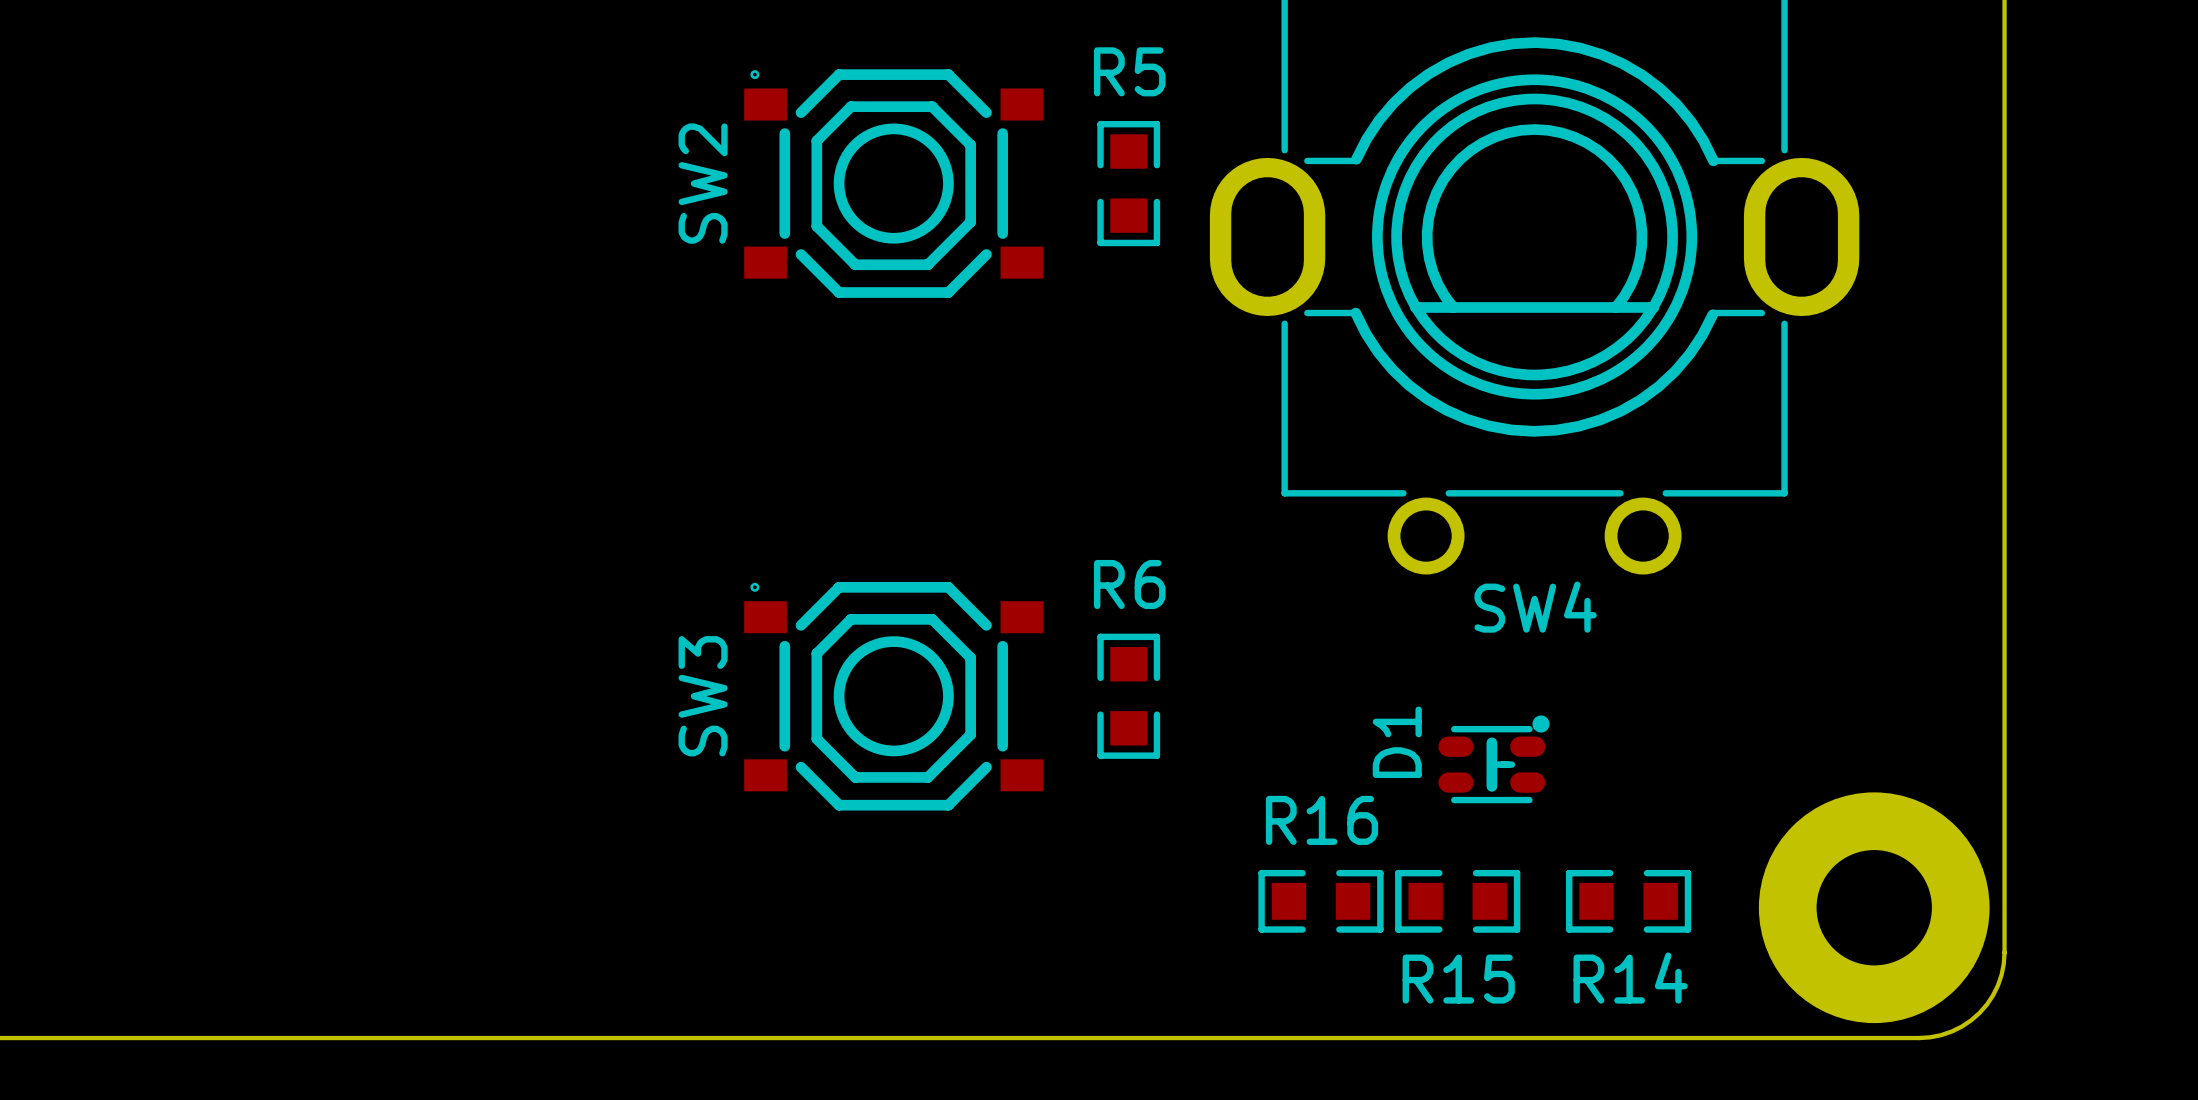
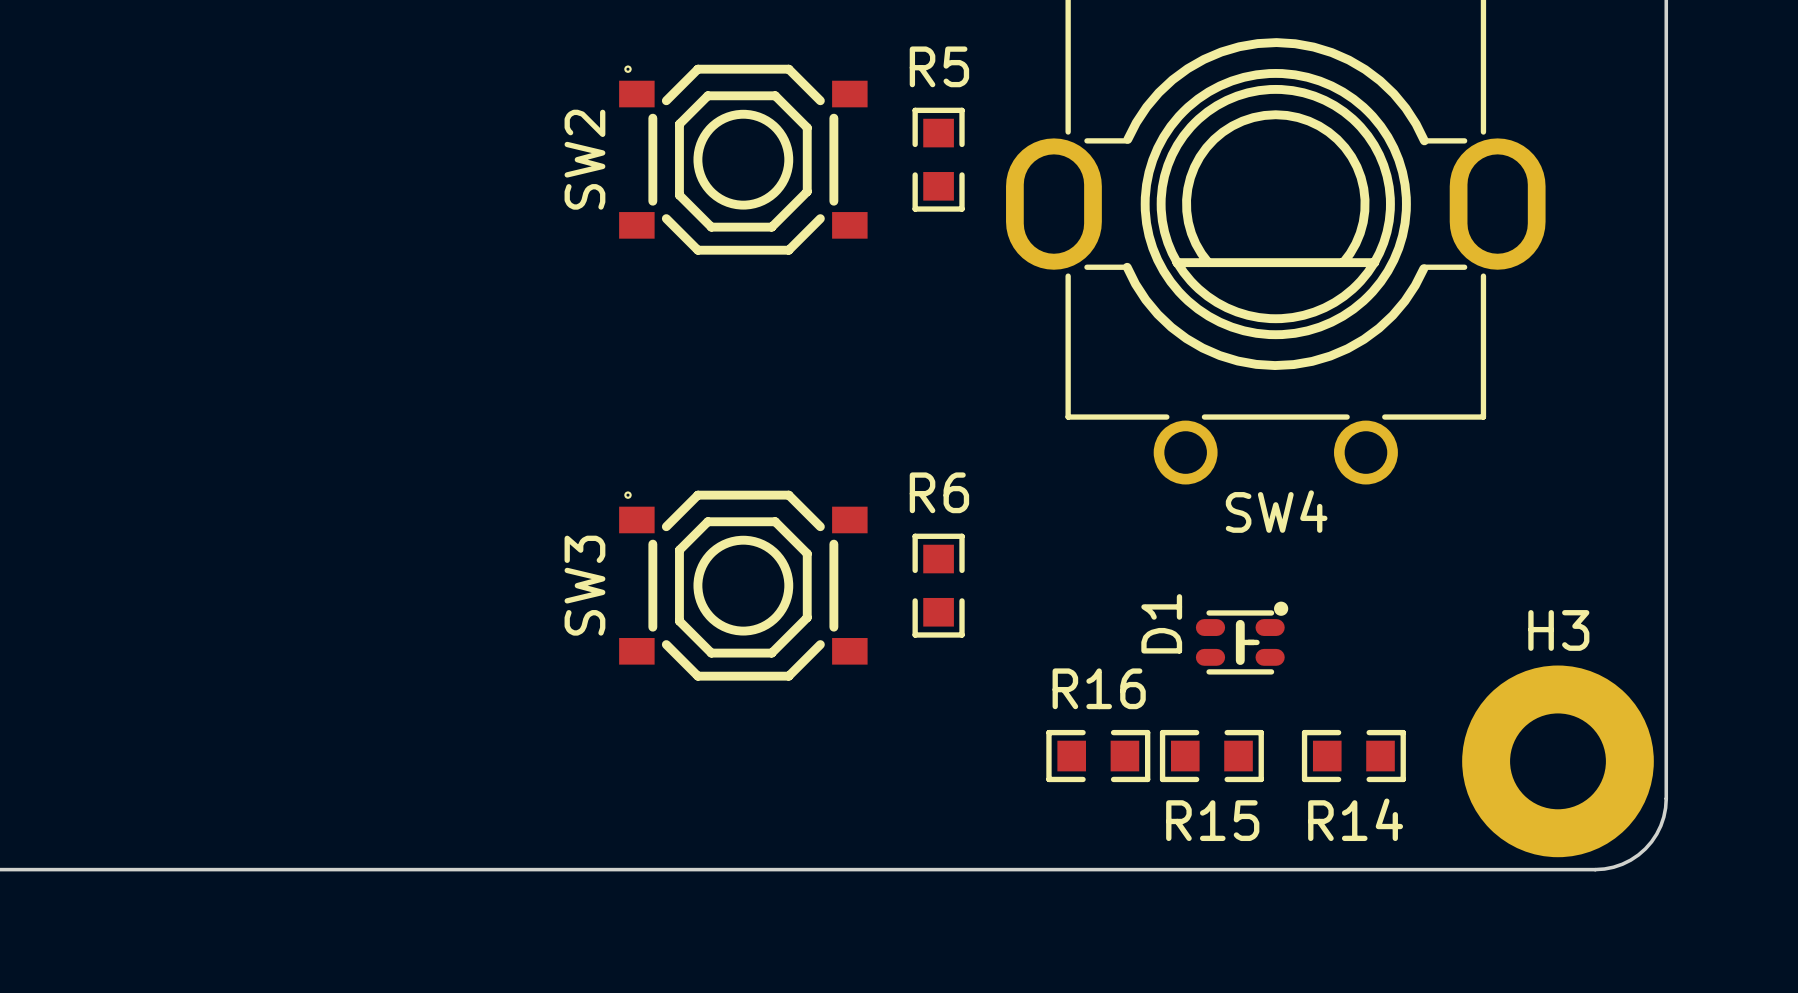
H3 name: none -> H3 (1558, 630)

